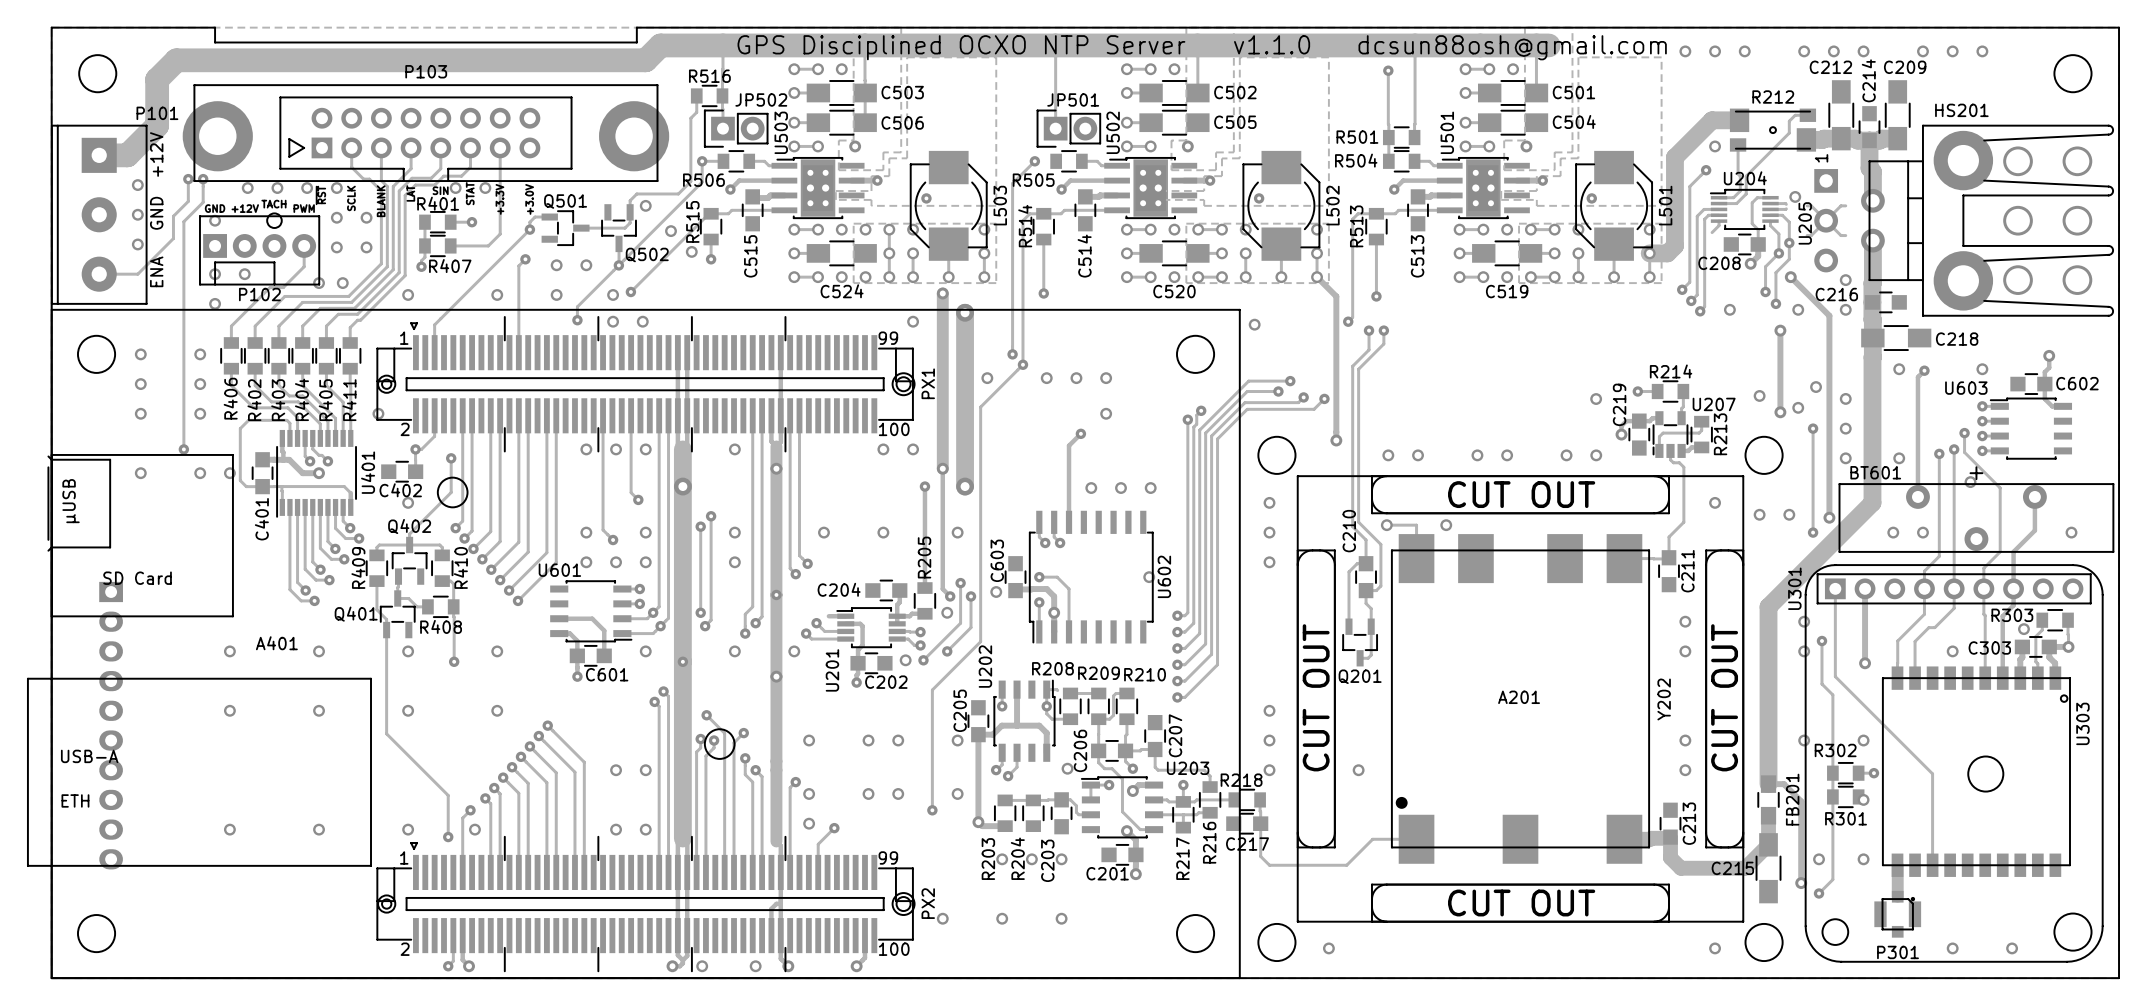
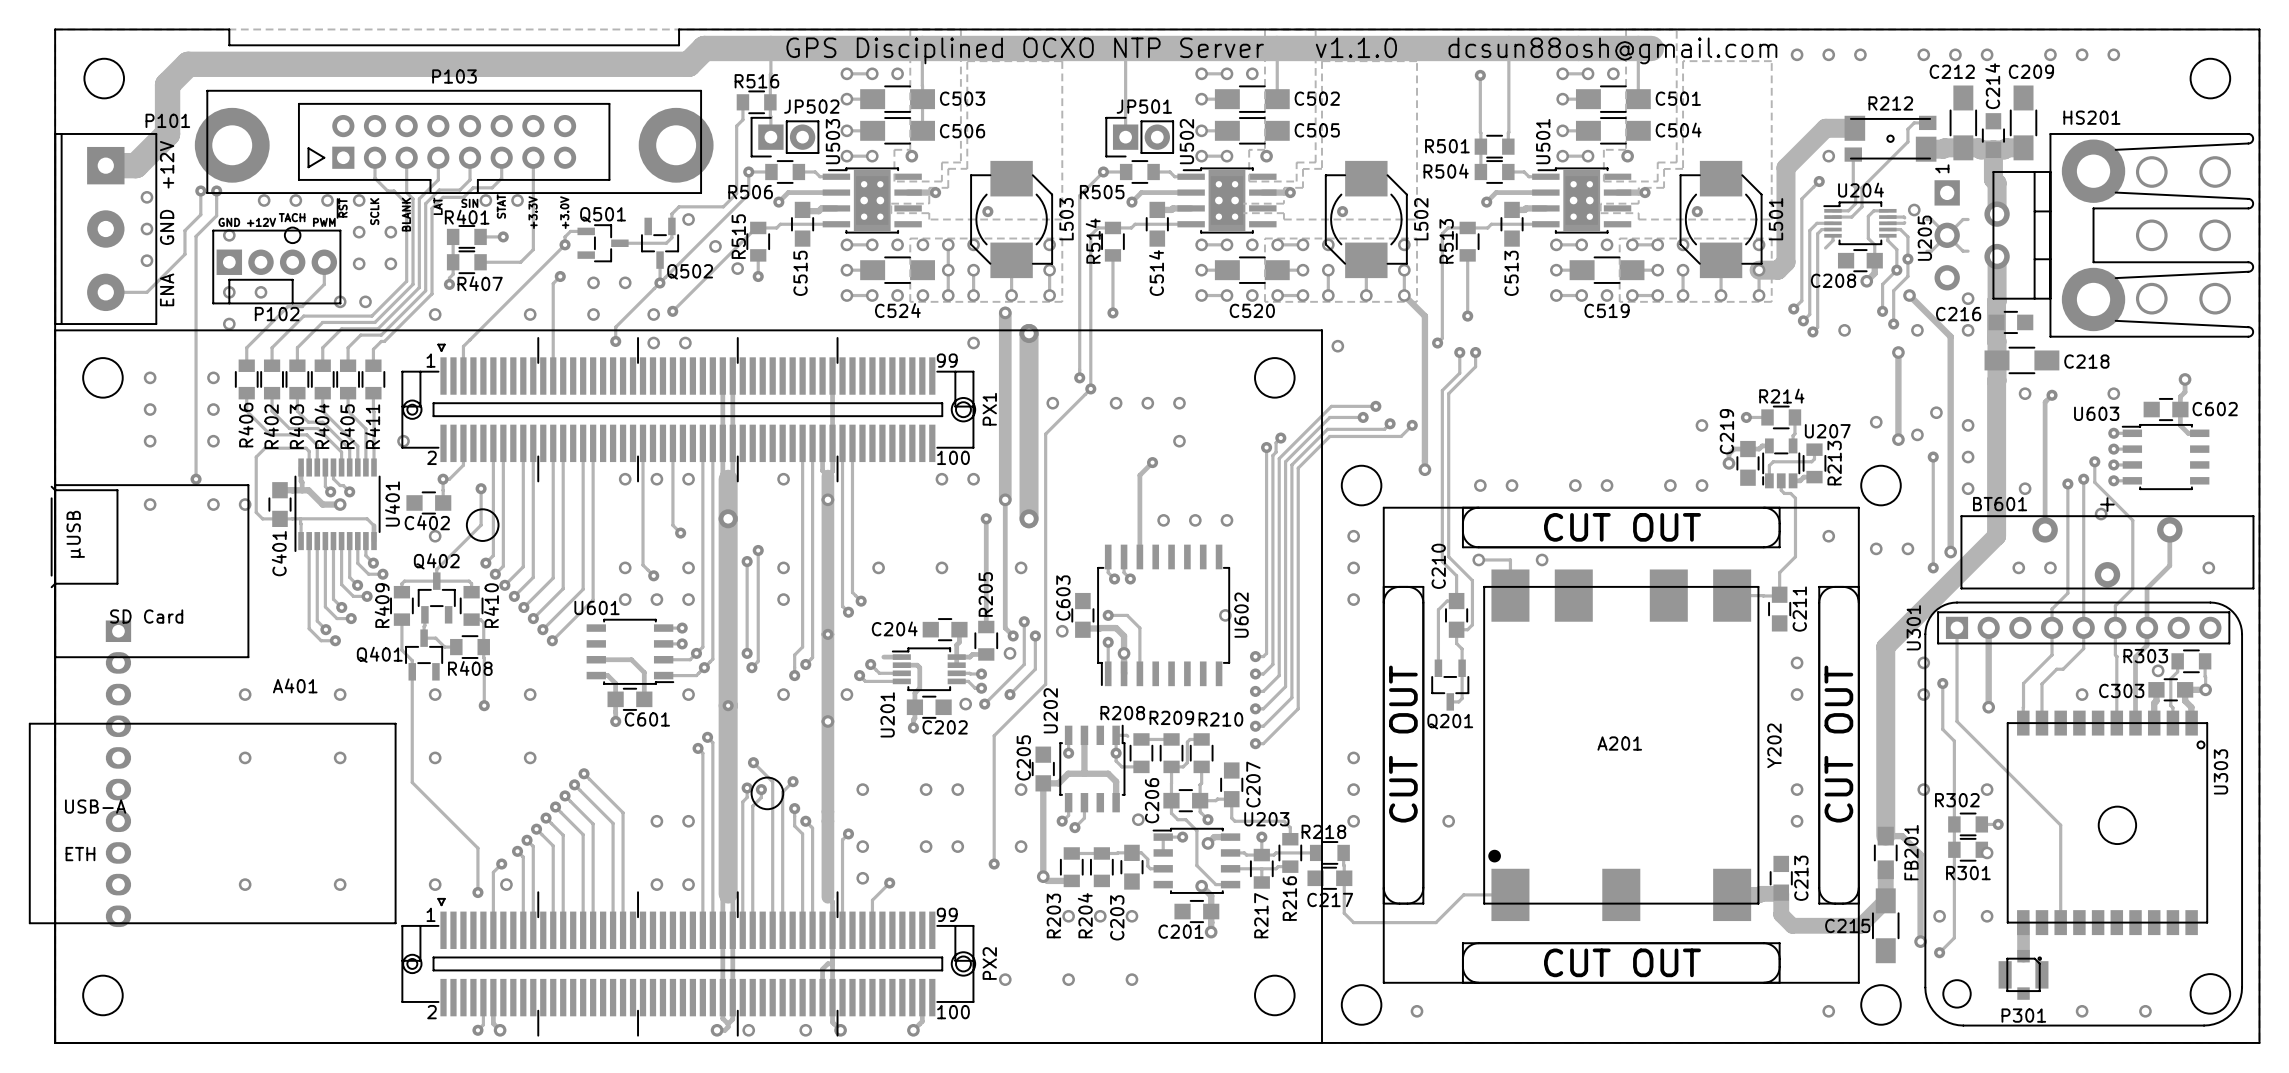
track: none -> (1103, 171) (1126, 171)

